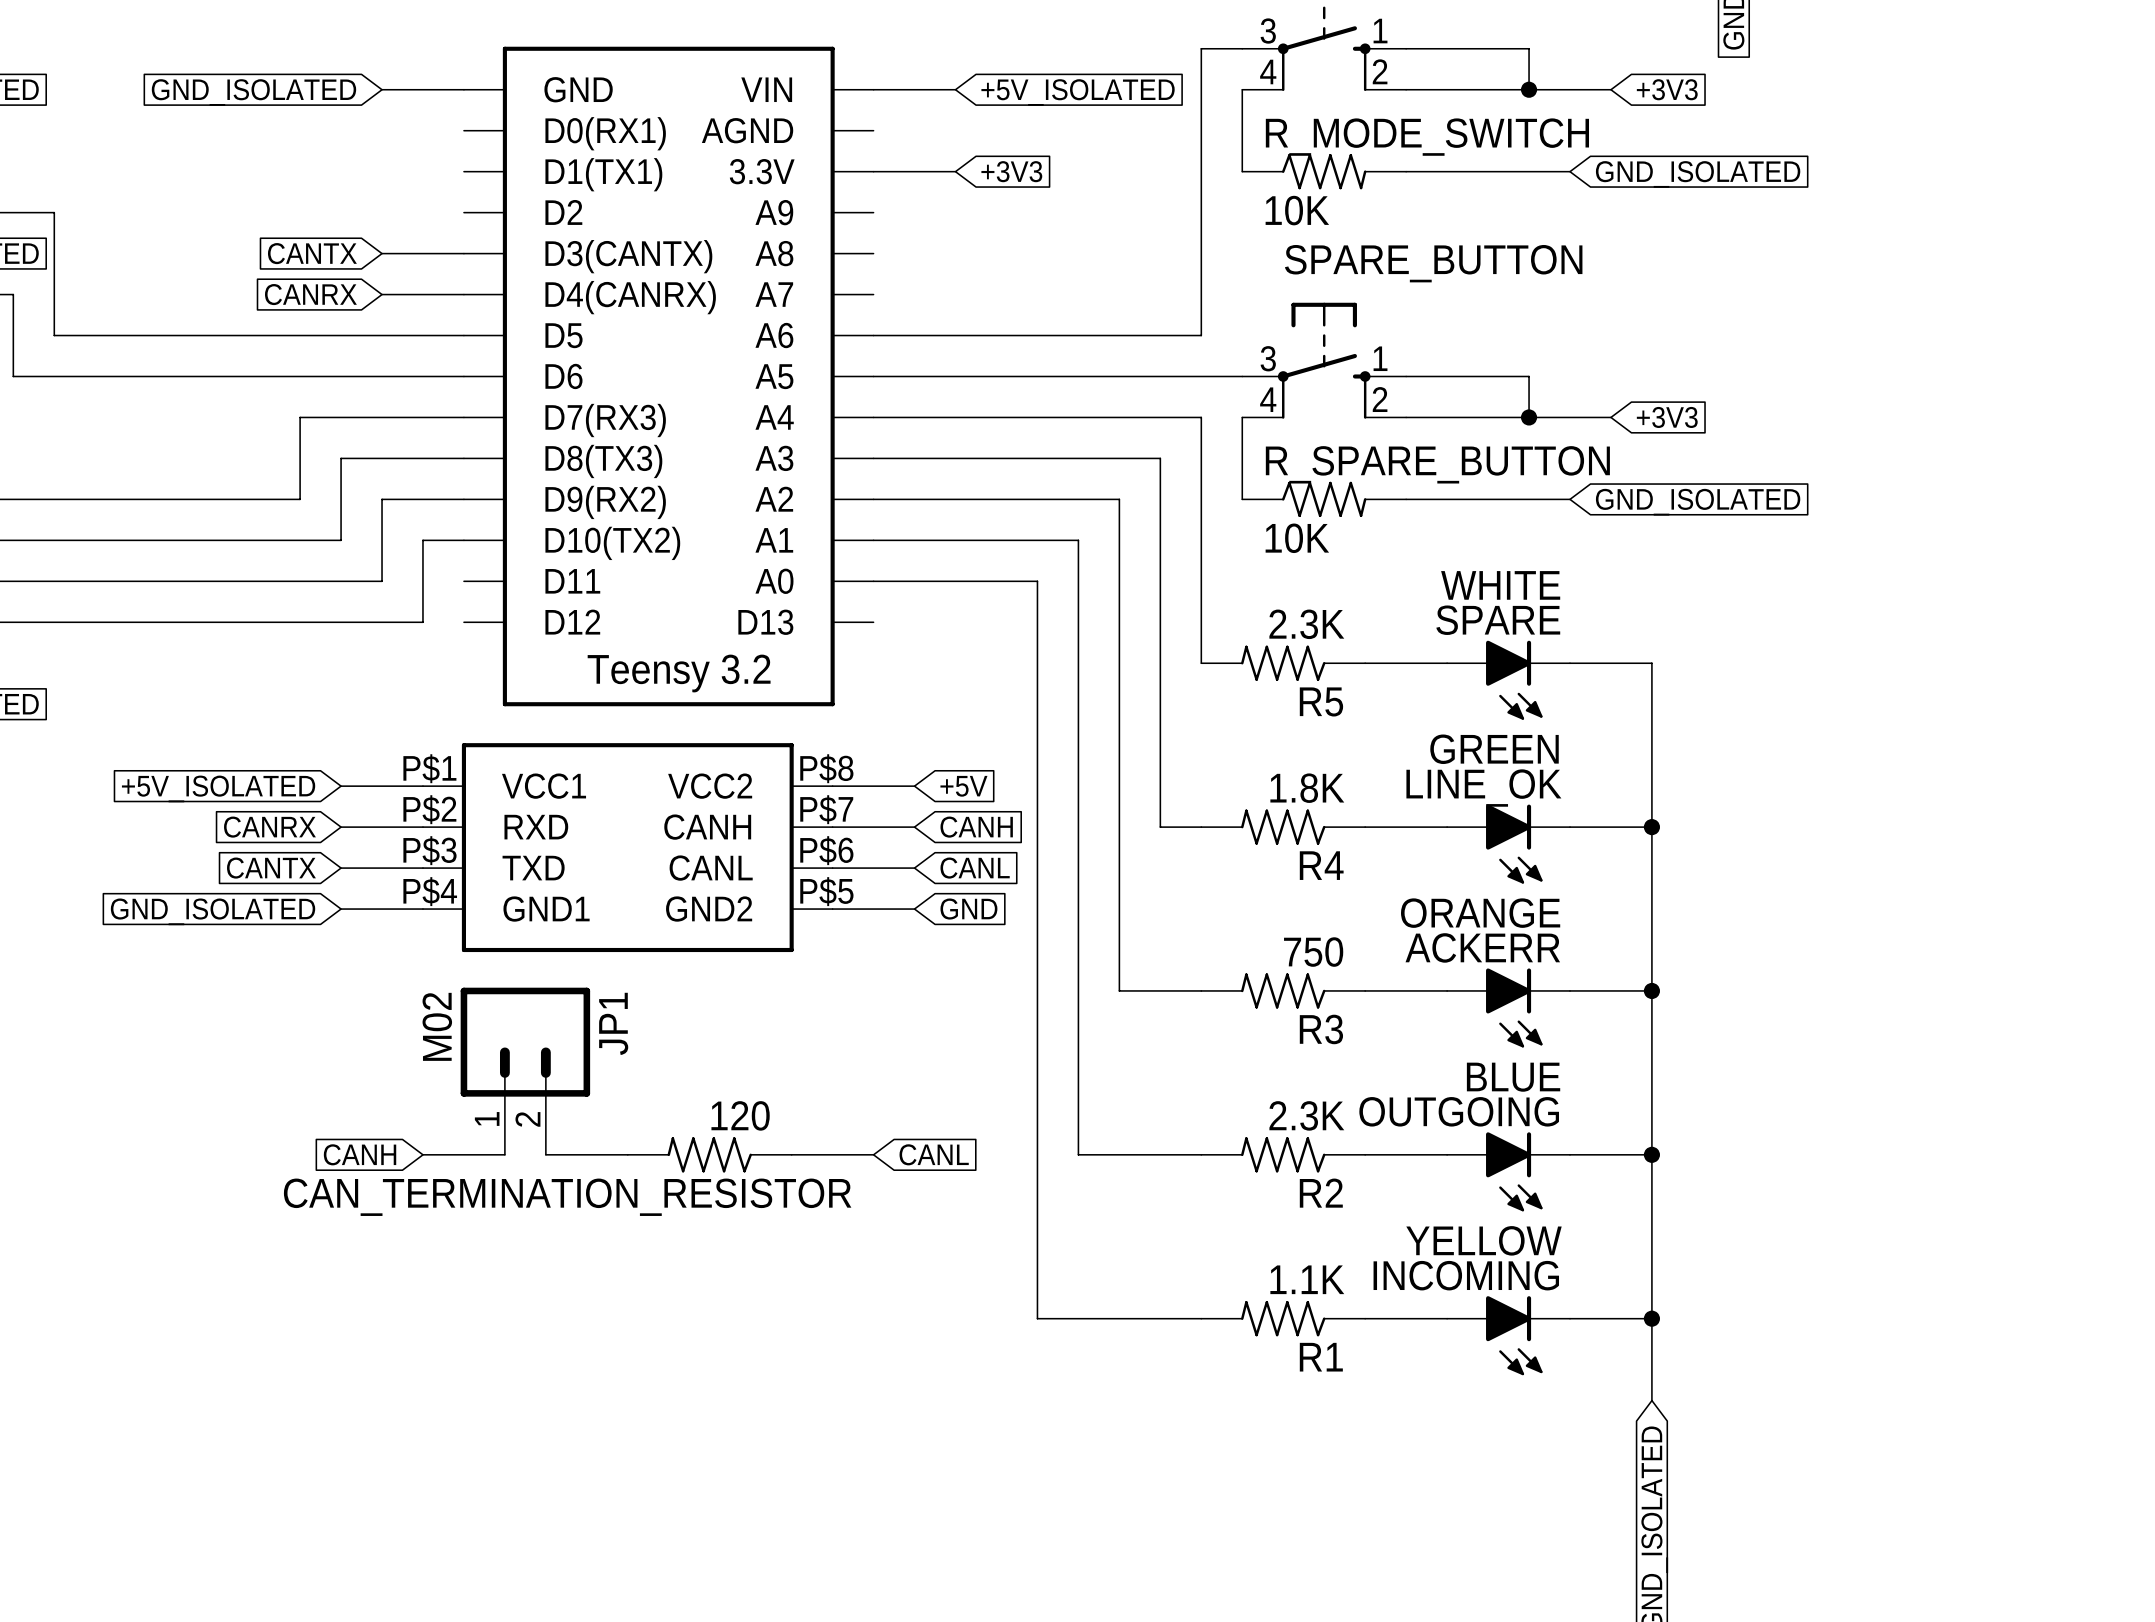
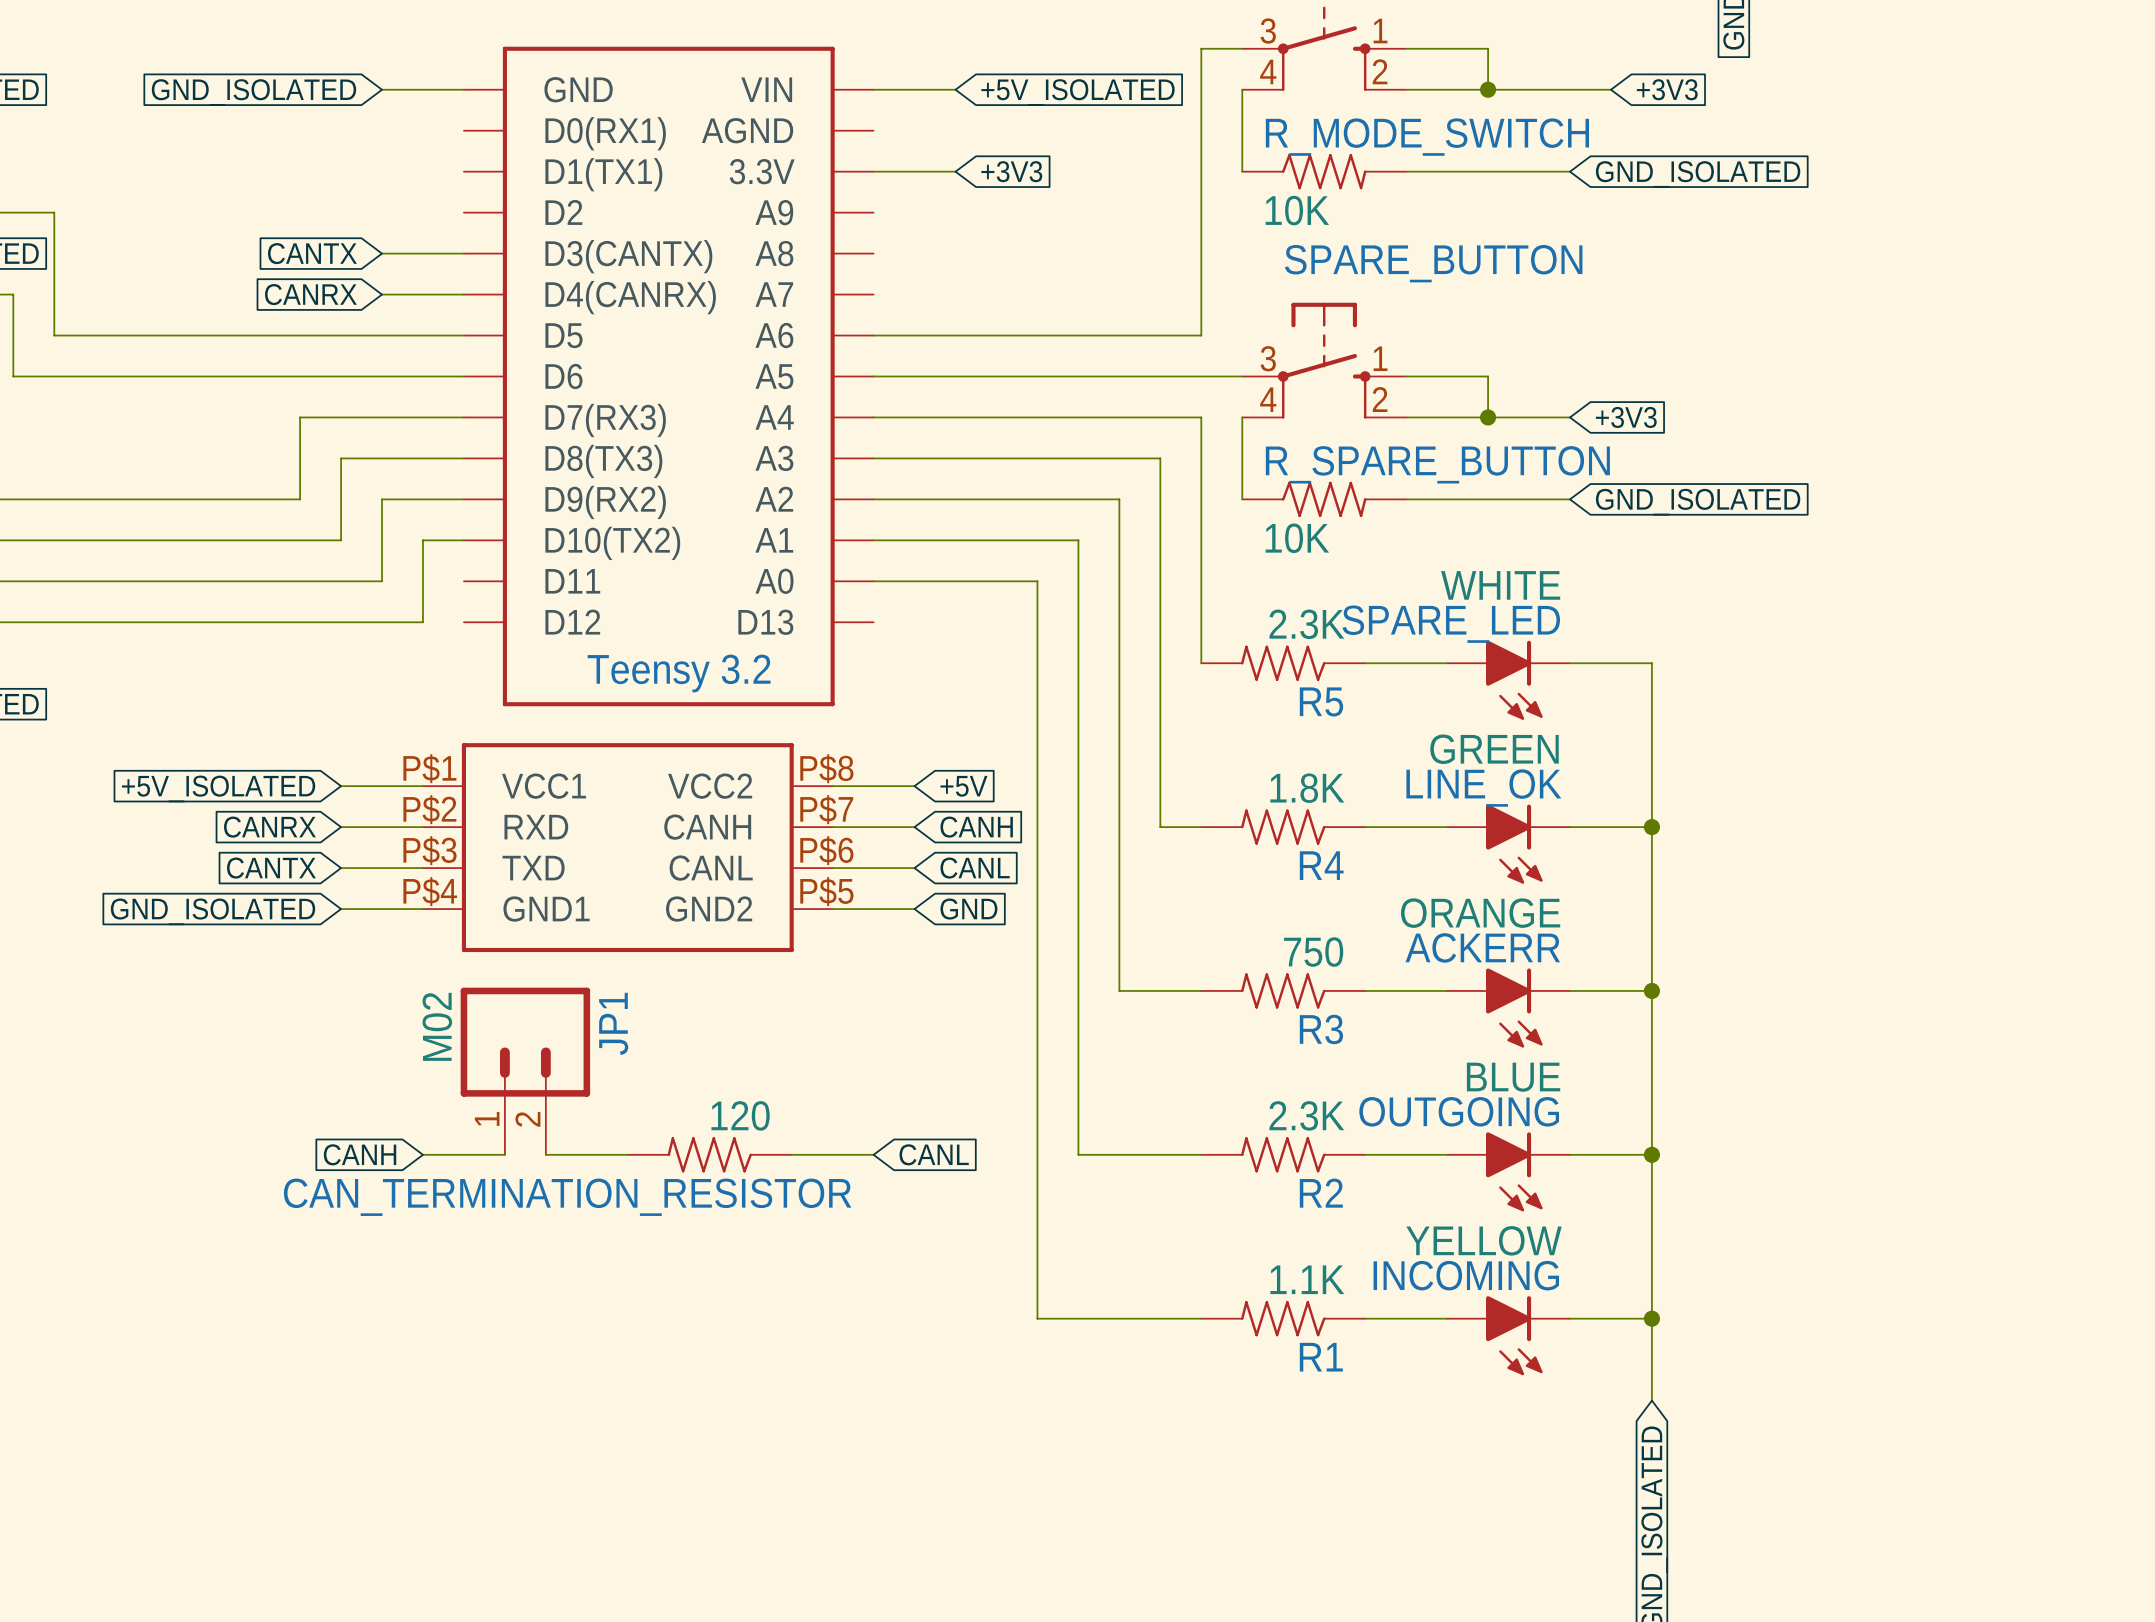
wire: (1488, 48) (1529, 48) (1529, 89) -> (1488, 48) (1488, 89)
junction position: (1529, 89) -> (1488, 89)
wire: (1488, 376) (1529, 376) (1529, 417) -> (1488, 376) (1488, 417)
junction position: (1529, 417) -> (1488, 417)
wire: (1570, 417) (1610, 417) -> none
global label position: +3V3 (1667, 417) -> +3V3 (1626, 417)
SPARE name: SPARE (1498, 620) -> SPARE_LED (1451, 624)

